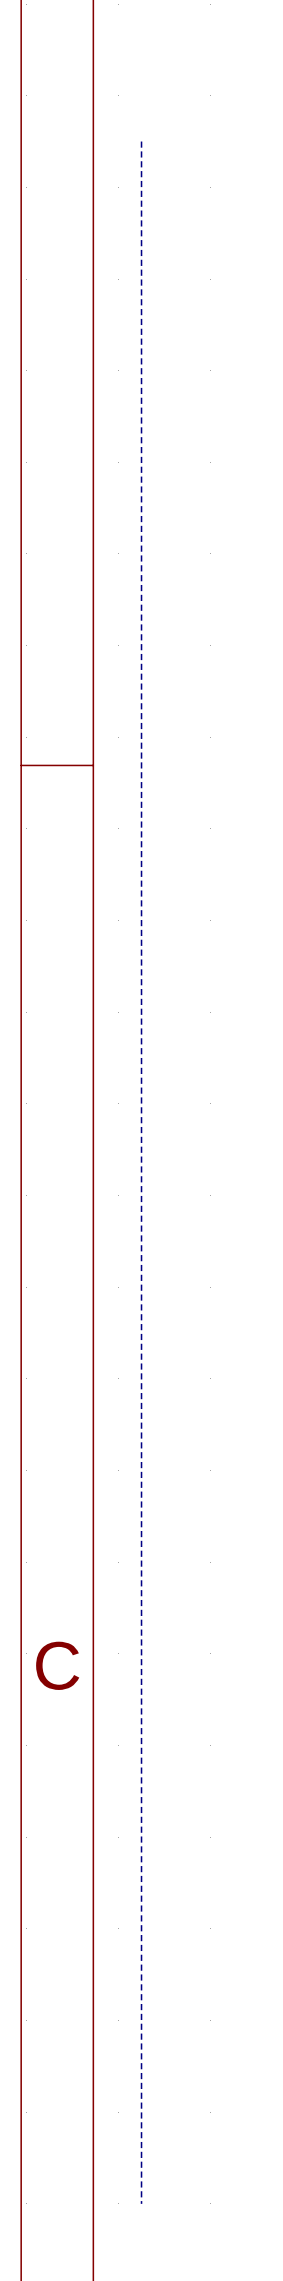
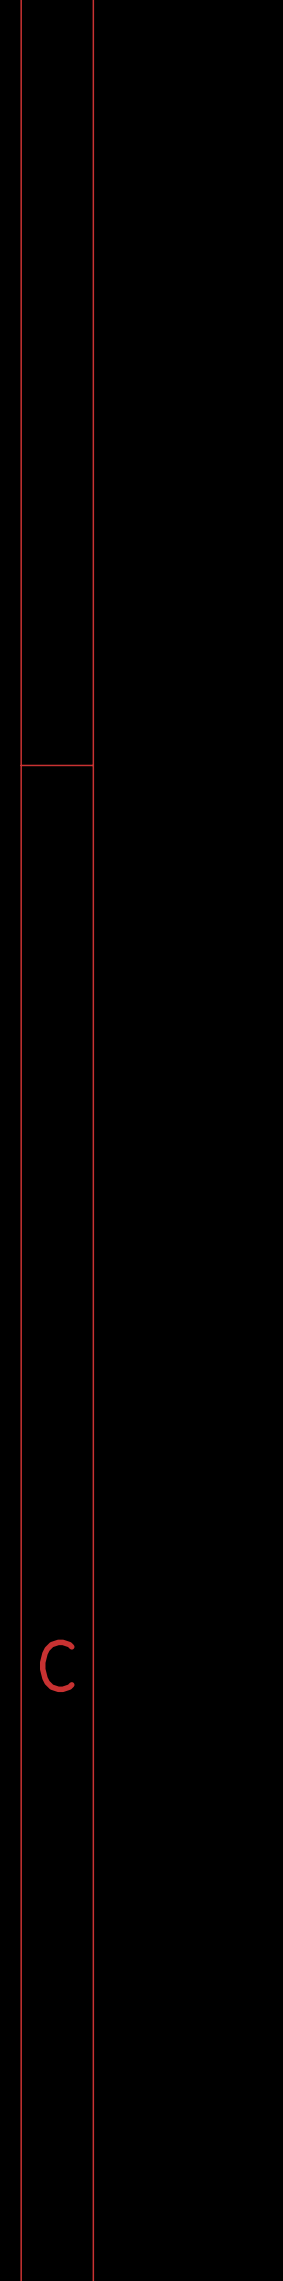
line: (141, 141) (141, 2203) -> none

